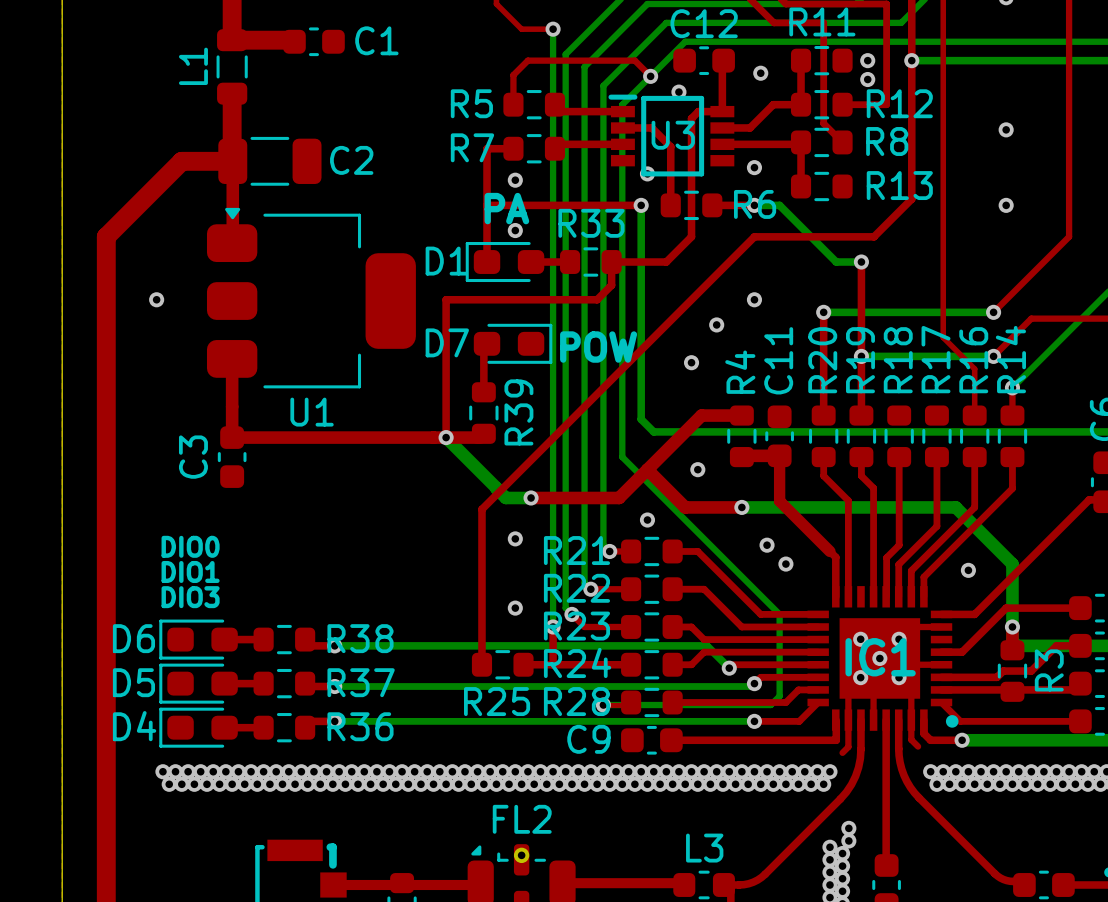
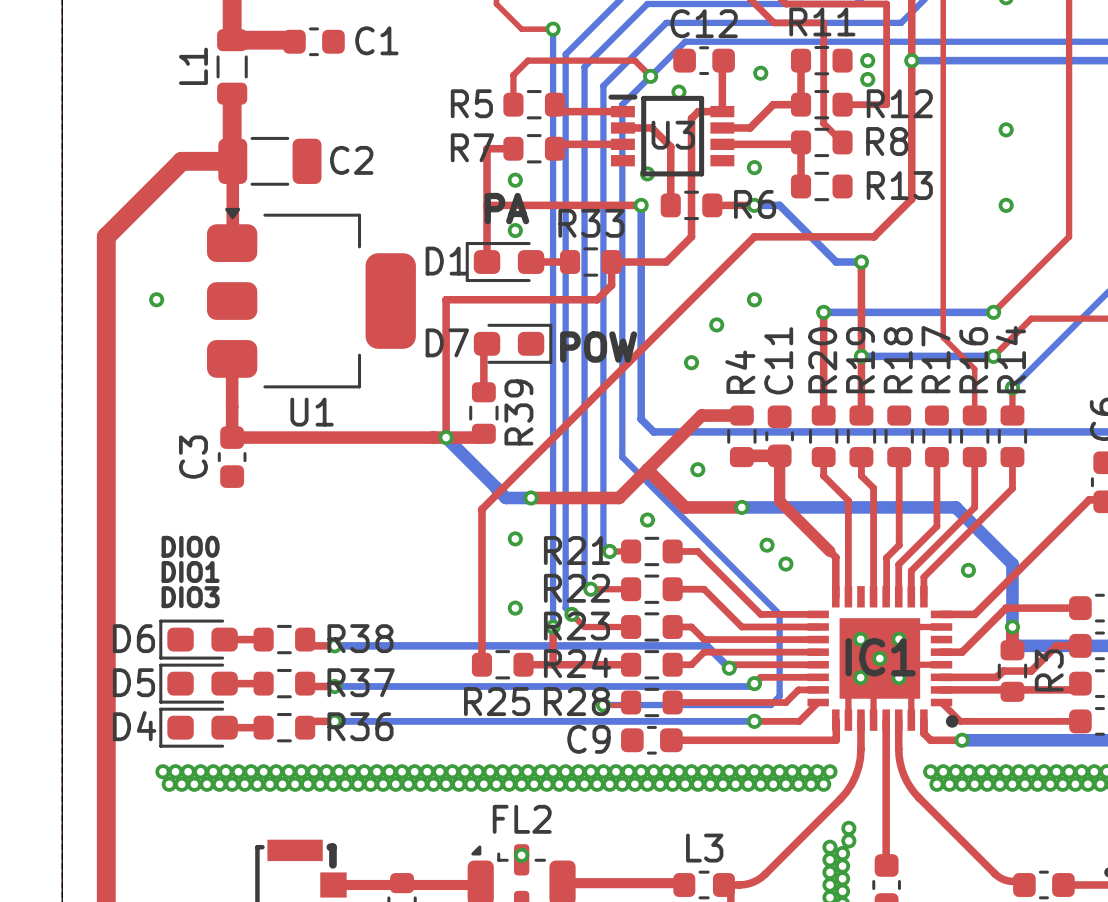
top track: (848, 720) (848, 747) (842, 752) -> none
top track: (911, 720) (911, 739) (918, 746) -> none

